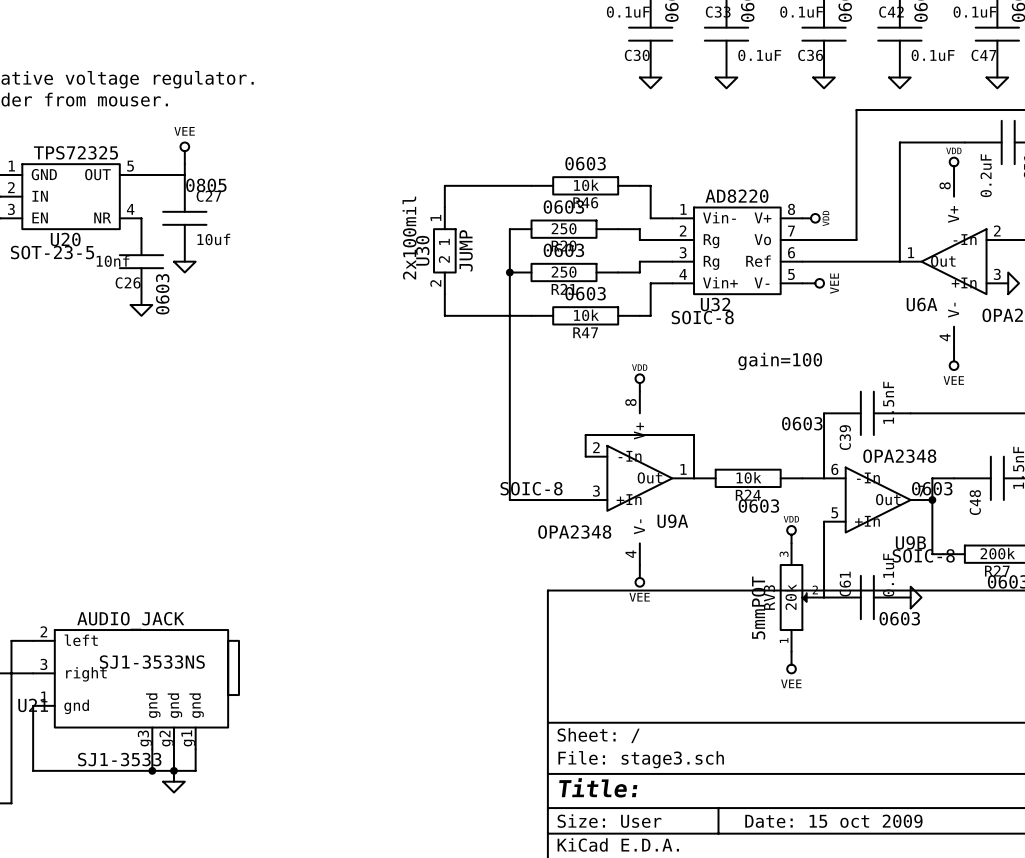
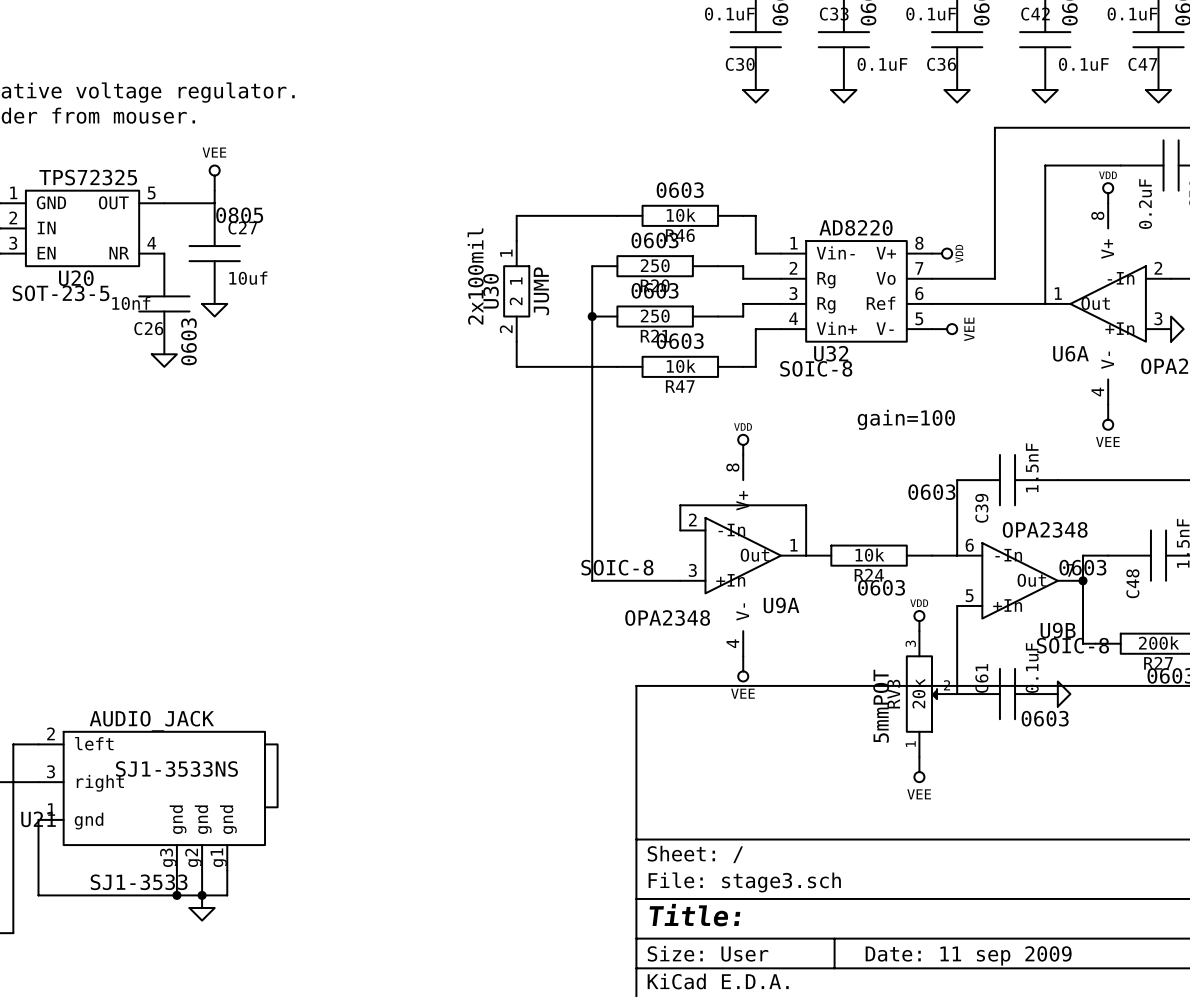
title block: Date: 15 oct 2009 (833, 821) -> Date: 11 sep 2009 (968, 955)

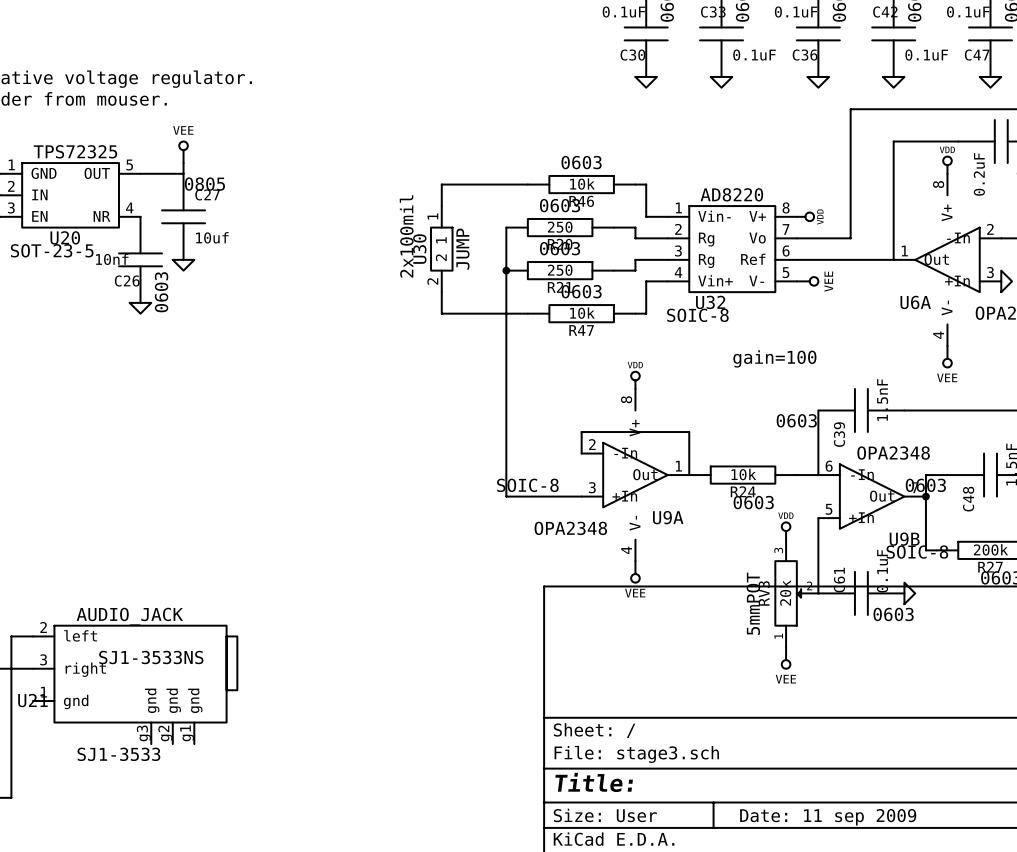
wire: (38, 819) (38, 895) (227, 895) (227, 870) -> none
wire: (176, 870) (176, 895) -> none
wire: (202, 870) (202, 907) -> none
junction: (176, 895) -> none
junction: (202, 895) -> none
power symbol: (202, 914) -> none

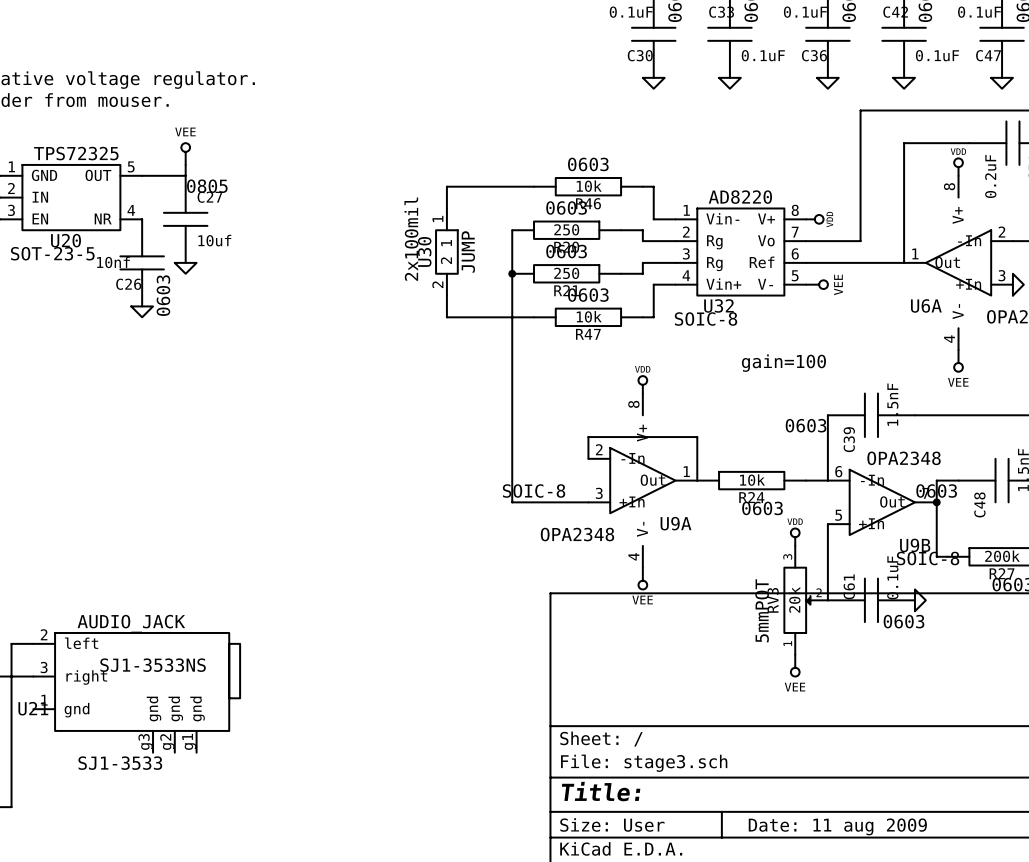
title block: Date: 11 sep 2009 (828, 817) -> Date: 11 aug 2009 (837, 826)

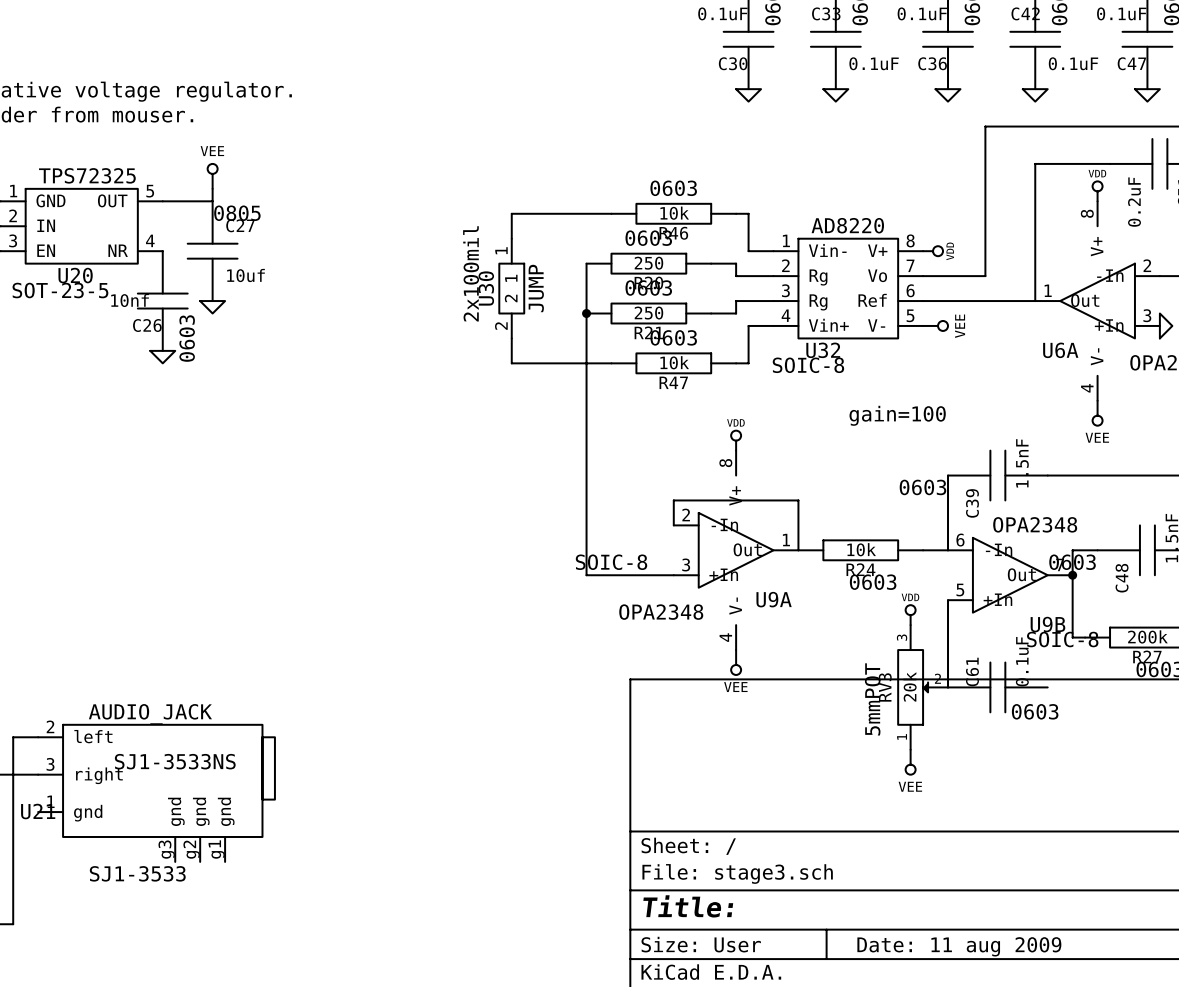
power symbol: (920, 600) -> none

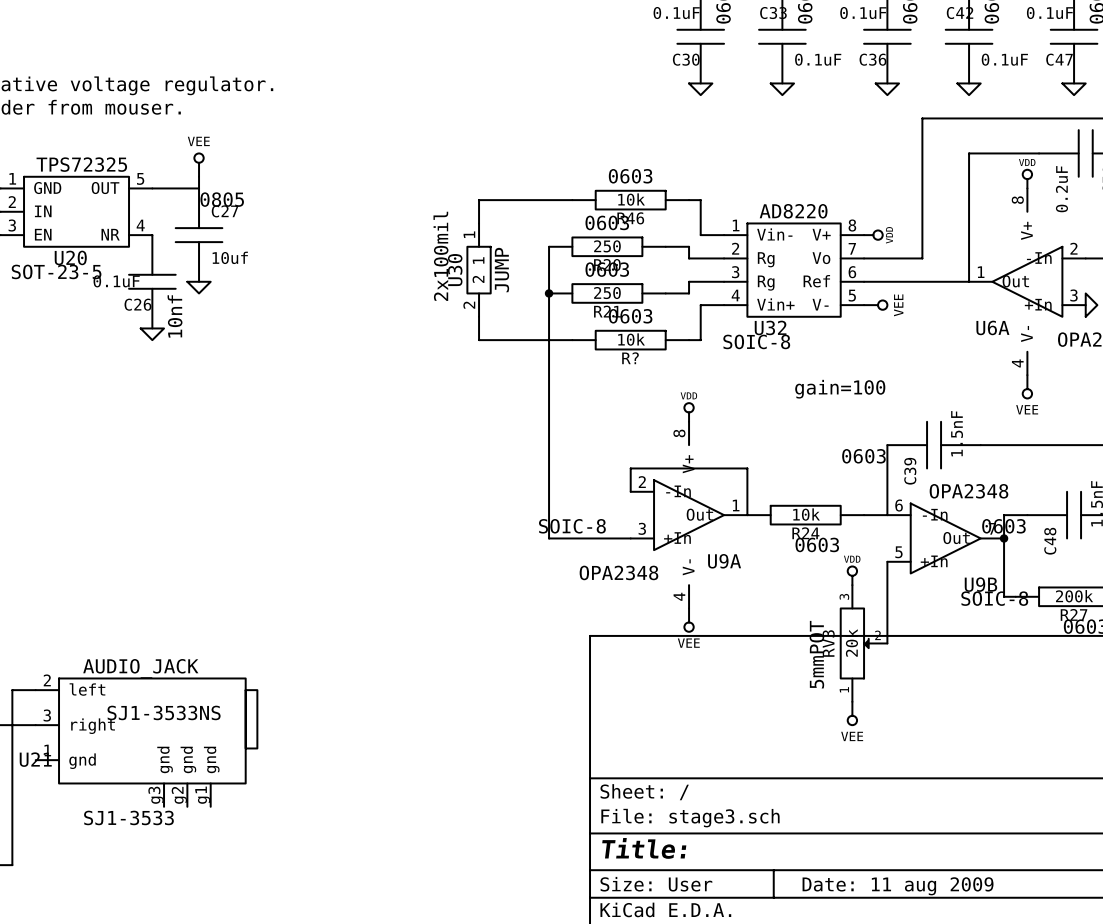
C26 value: 10nf (130, 300) -> 0.1uF (116, 281)
C26 text: 0603 (187, 338) -> 10nf (175, 316)
R47 name: R47 (673, 382) -> R? (630, 358)
C61: 0.1uF (997, 687) -> none

